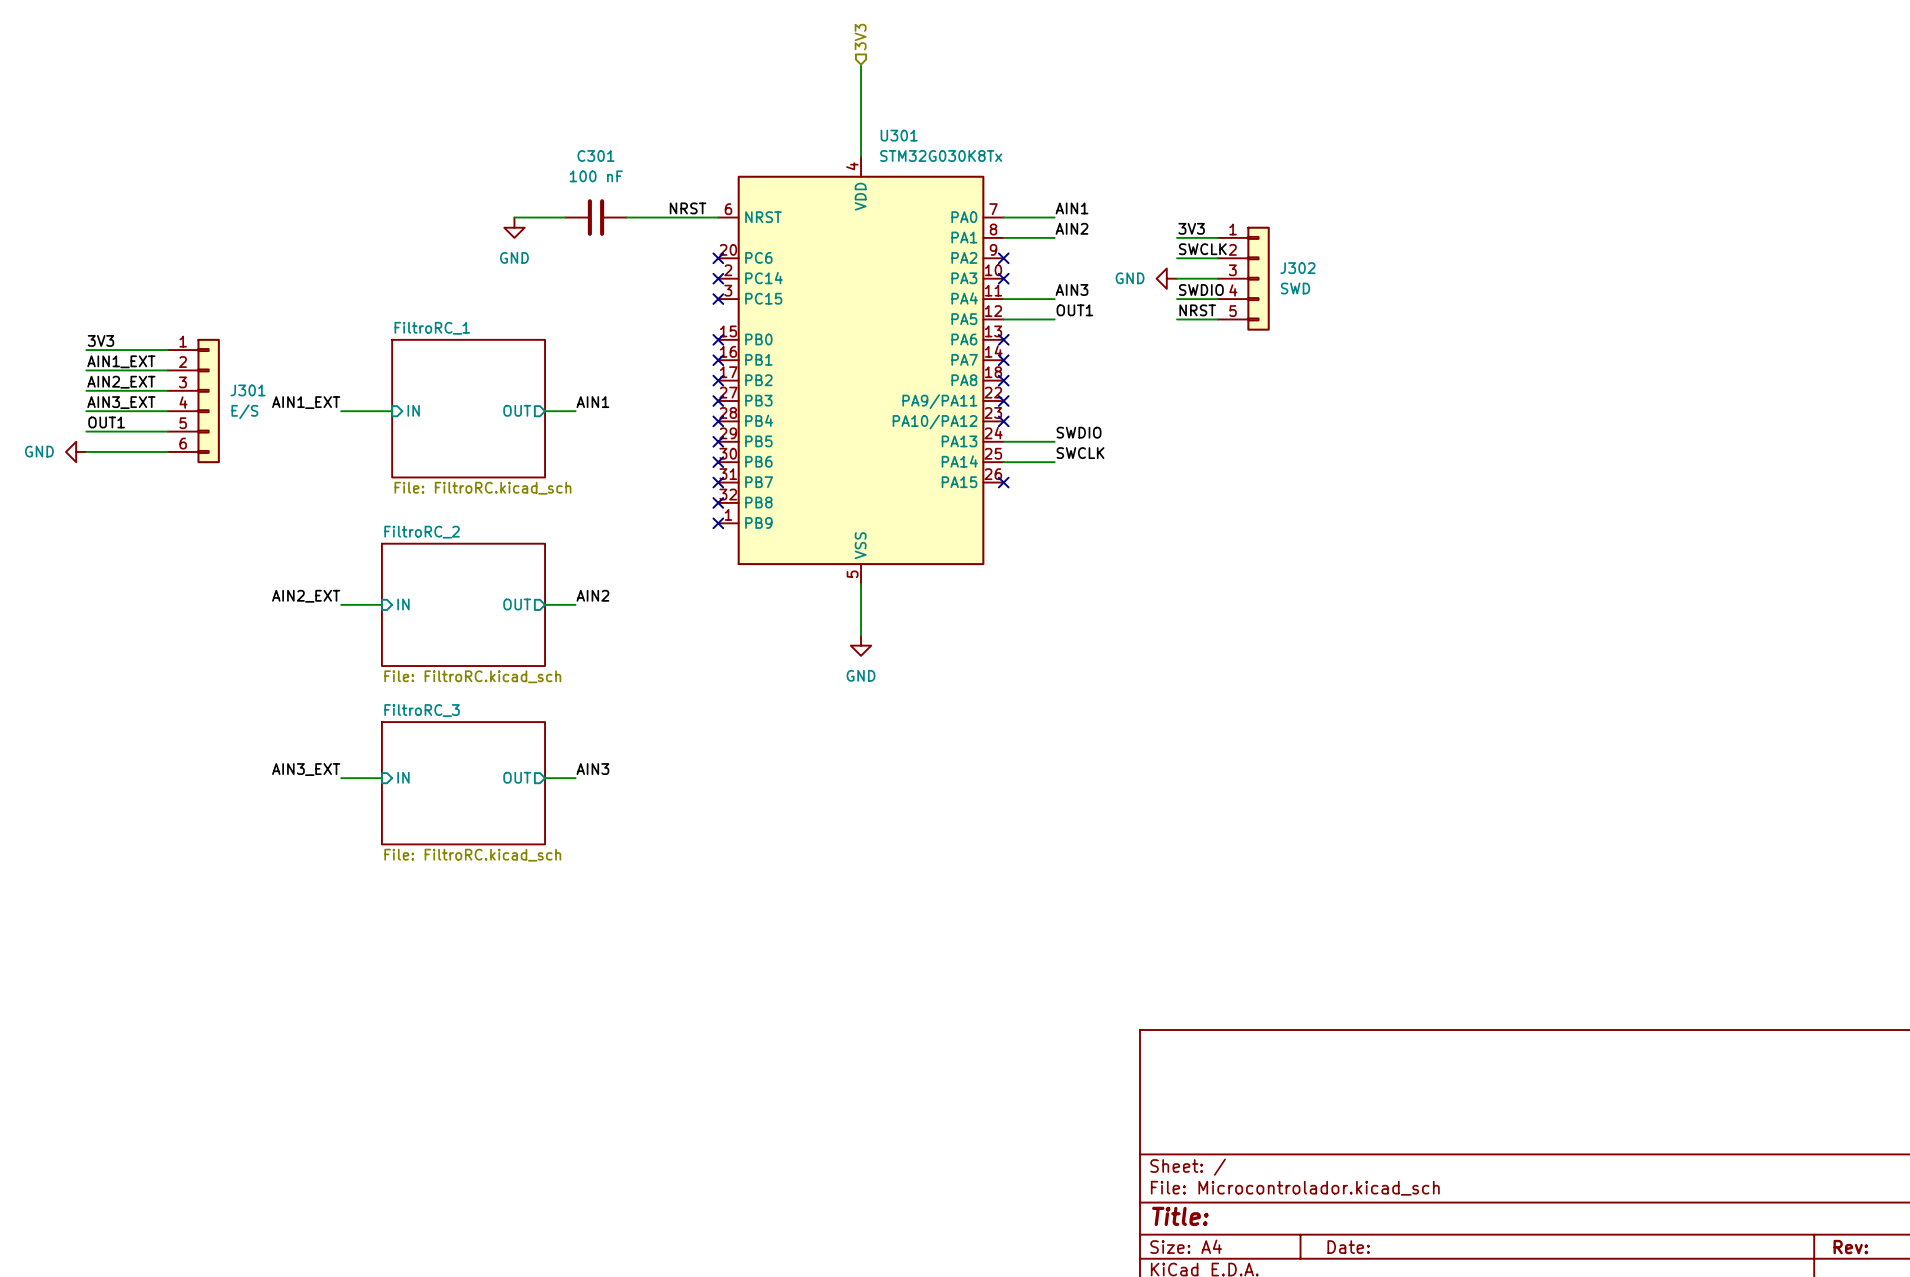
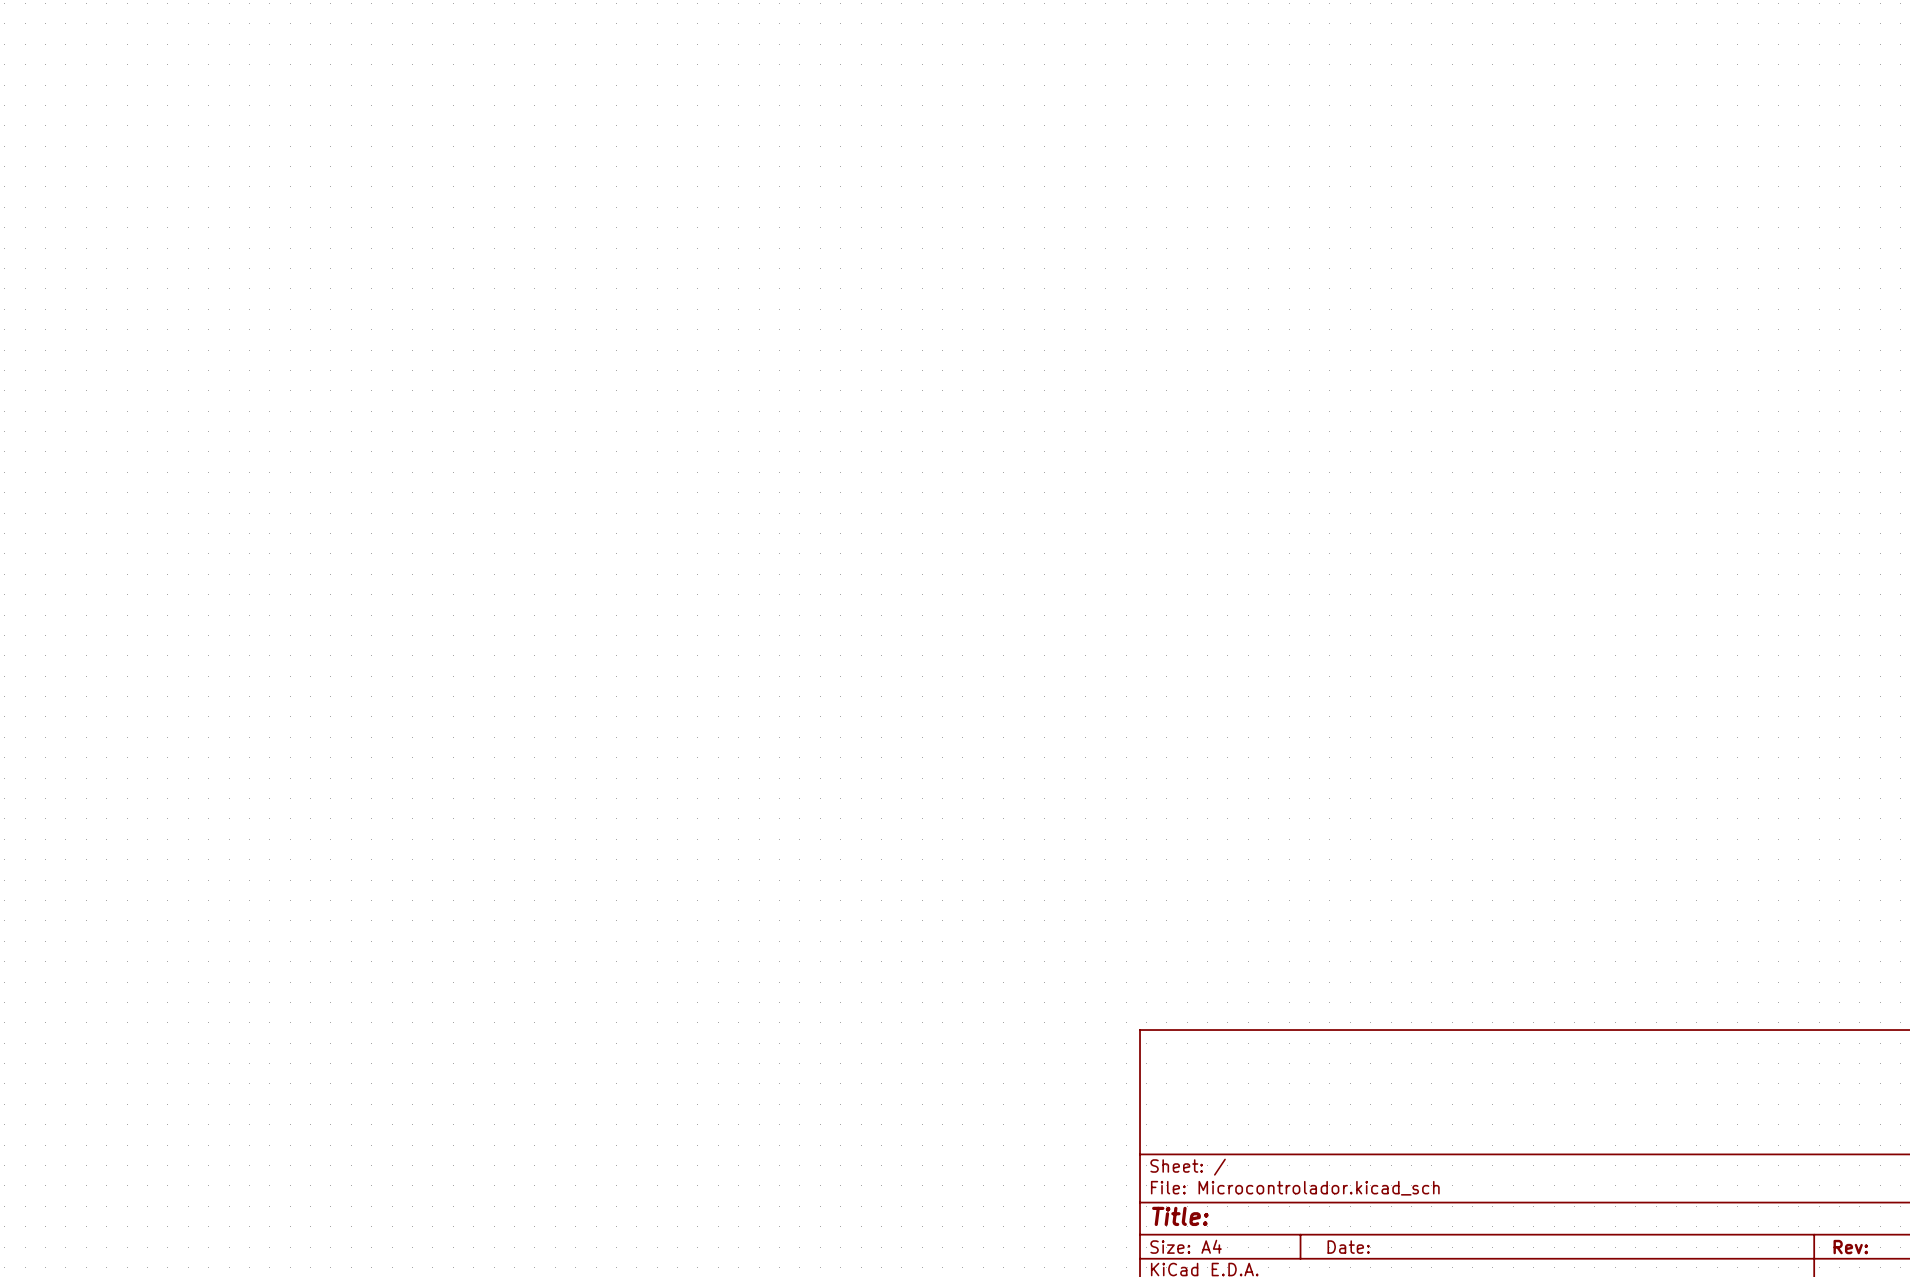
hierarchical label: 3V3 (860, 37) -> none
wire: (861, 64) (861, 156) -> none
label: NRST (688, 208) -> none
label: AIN1 (1071, 208) -> none
wire: (514, 217) (565, 217) -> none
C301: 100 nF (596, 217) -> none
wire: (626, 217) (718, 217) -> none
wire: (1003, 217) (1054, 217) -> none
power symbol: GND (514, 227) -> none
label: AIN2 (1071, 228) -> none
label: 3V3 (1191, 228) -> none
wire: (1003, 237) (1054, 237) -> none
wire: (1177, 237) (1217, 237) -> none
label: SWCLK (1202, 249) -> none
no-connect mark: (718, 258) -> none
no-connect mark: (1003, 258) -> none
wire: (1177, 258) (1217, 258) -> none
no-connect mark: (718, 278) -> none
no-connect mark: (1003, 278) -> none
power symbol: GND (1166, 278) -> none
wire: (1177, 278) (1217, 278) -> none
J302: SWD (1243, 278) -> none
label: AIN3 (1071, 289) -> none
label: SWDIO (1201, 289) -> none
no-connect mark: (718, 299) -> none
wire: (1003, 299) (1054, 299) -> none
wire: (1177, 299) (1217, 299) -> none
label: OUT1 (1074, 310) -> none
label: NRST (1197, 310) -> none
wire: (1003, 319) (1054, 319) -> none
wire: (1177, 319) (1217, 319) -> none
no-connect mark: (718, 339) -> none
no-connect mark: (1003, 339) -> none
label: 3V3 (100, 340) -> none
wire: (86, 350) (167, 350) -> none
no-connect mark: (718, 360) -> none
no-connect mark: (1003, 360) -> none
label: AIN1_EXT (121, 361) -> none
wire: (86, 370) (167, 370) -> none
U301: STM32G030K8Tx (861, 370) -> none
no-connect mark: (718, 380) -> none
no-connect mark: (1003, 380) -> none
label: AIN2_EXT (121, 382) -> none
wire: (86, 390) (167, 390) -> none
J301: E/S (193, 401) -> none
no-connect mark: (718, 401) -> none
no-connect mark: (1003, 401) -> none
label: AIN3_EXT (121, 402) -> none
label: AIN1_EXT (306, 402) -> none
label: AIN1 (592, 402) -> none
sheet FiltroRC_1: File: FiltroRC.kicad_sch (468, 408) -> none
sheet pin: IN (413, 410) -> none
sheet pin: OUT (517, 410) -> none
wire: (86, 411) (167, 411) -> none
wire: (341, 411) (392, 411) -> none
wire: (545, 411) (575, 411) -> none
no-connect mark: (718, 421) -> none
no-connect mark: (1003, 421) -> none
label: OUT1 (106, 422) -> none
wire: (86, 431) (167, 431) -> none
label: SWDIO (1079, 432) -> none
no-connect mark: (718, 441) -> none
wire: (1003, 441) (1054, 441) -> none
power symbol: GND (76, 451) -> none
wire: (86, 451) (167, 451) -> none
label: SWCLK (1080, 453) -> none
no-connect mark: (718, 462) -> none
wire: (1003, 462) (1054, 462) -> none
no-connect mark: (718, 482) -> none
no-connect mark: (1003, 482) -> none
no-connect mark: (718, 502) -> none
no-connect mark: (718, 523) -> none
wire: (861, 584) (861, 635) -> none
label: AIN2 (592, 595) -> none
label: AIN2_EXT (306, 596) -> none
wire: (341, 604) (381, 604) -> none
sheet pin: IN (403, 604) -> none
sheet FiltroRC_2: File: FiltroRC.kicad_sch (463, 604) -> none
sheet pin: OUT (517, 604) -> none
wire: (545, 604) (575, 604) -> none
power symbol: GND (861, 645) -> none
label: AIN3_EXT (306, 769) -> none
label: AIN3 (592, 769) -> none
sheet pin: IN (403, 777) -> none
sheet pin: OUT (517, 777) -> none
wire: (341, 778) (381, 778) -> none
wire: (545, 778) (575, 778) -> none
sheet FiltroRC_3: File: FiltroRC.kicad_sch (463, 783) -> none

